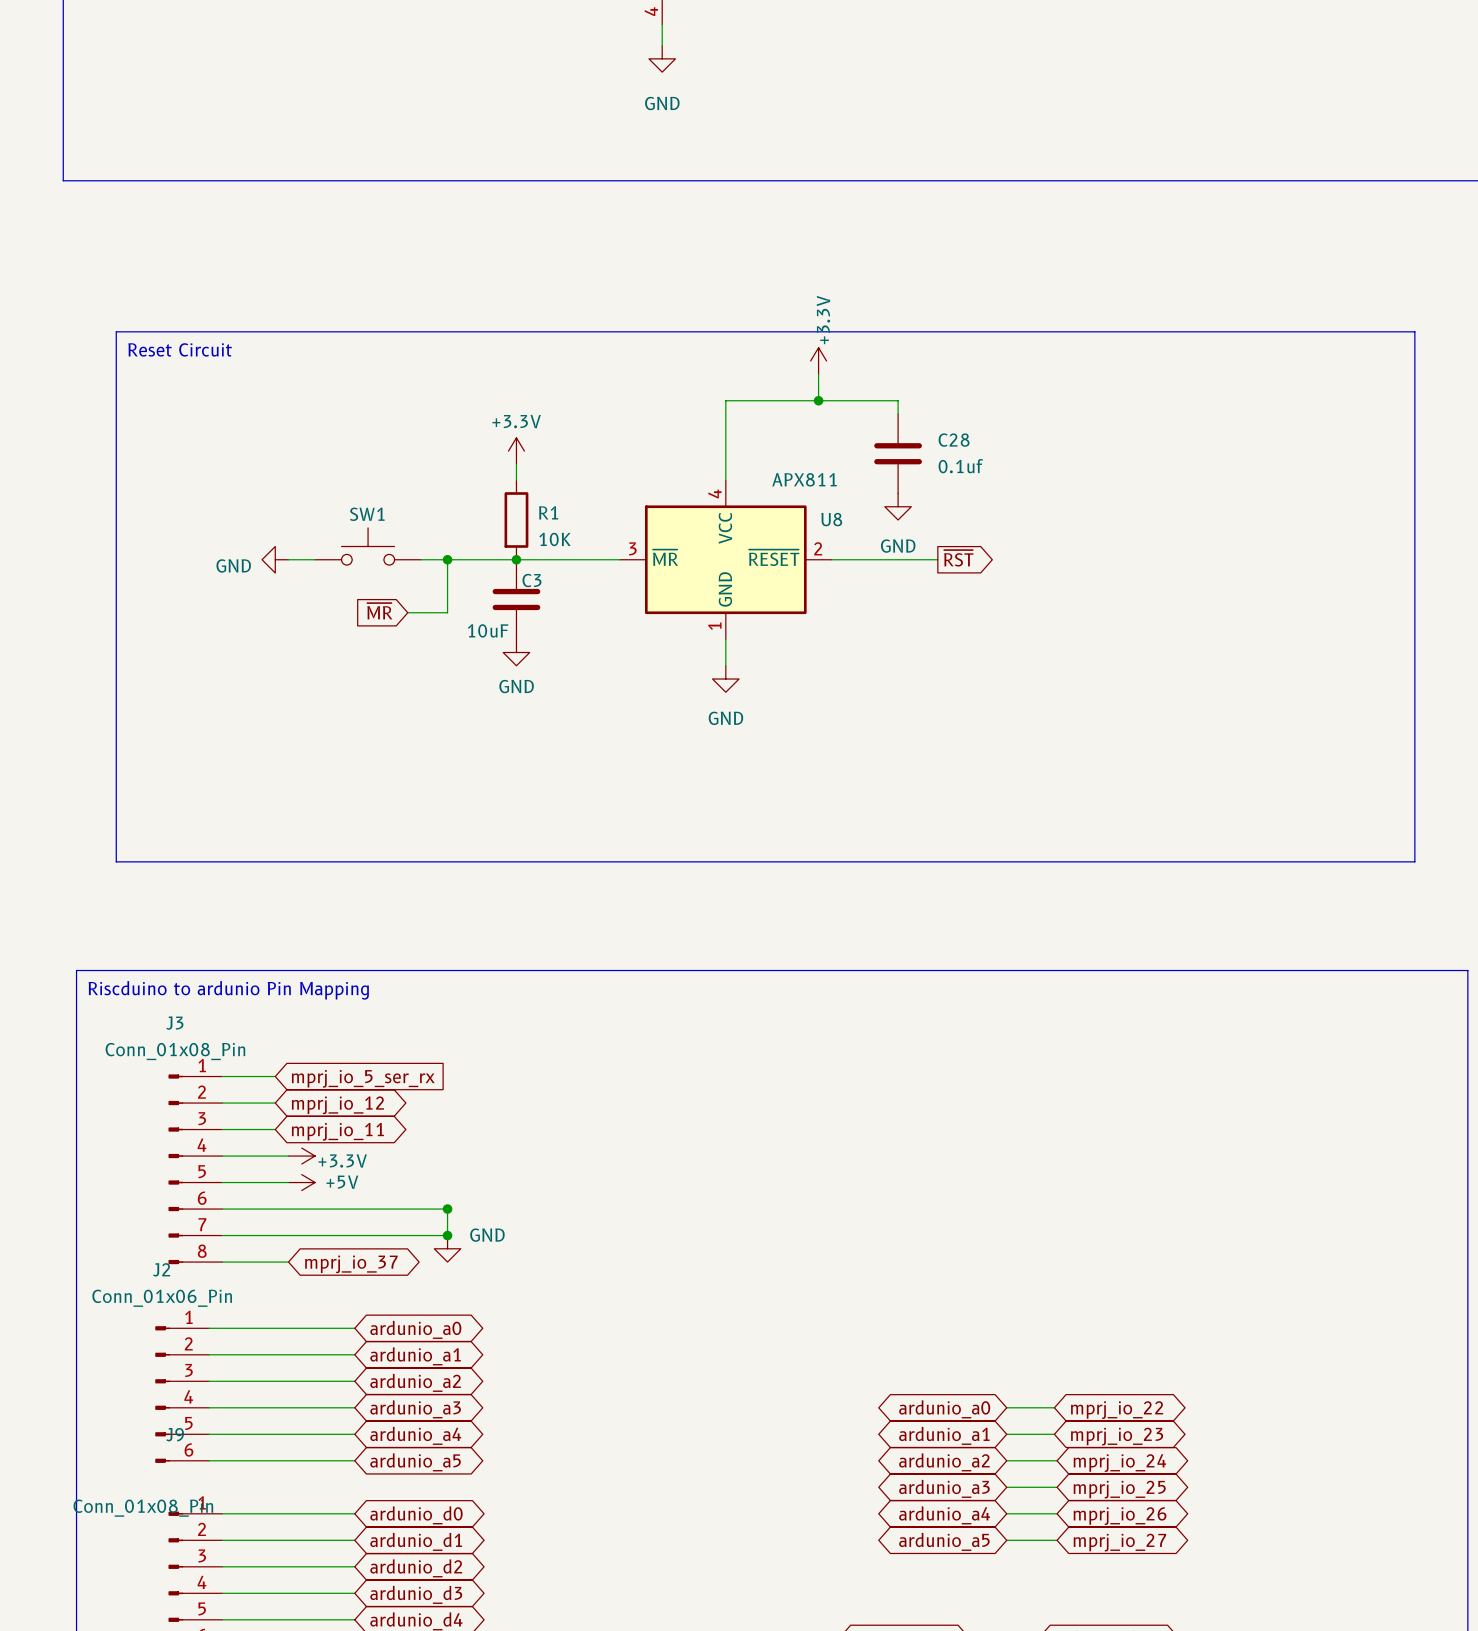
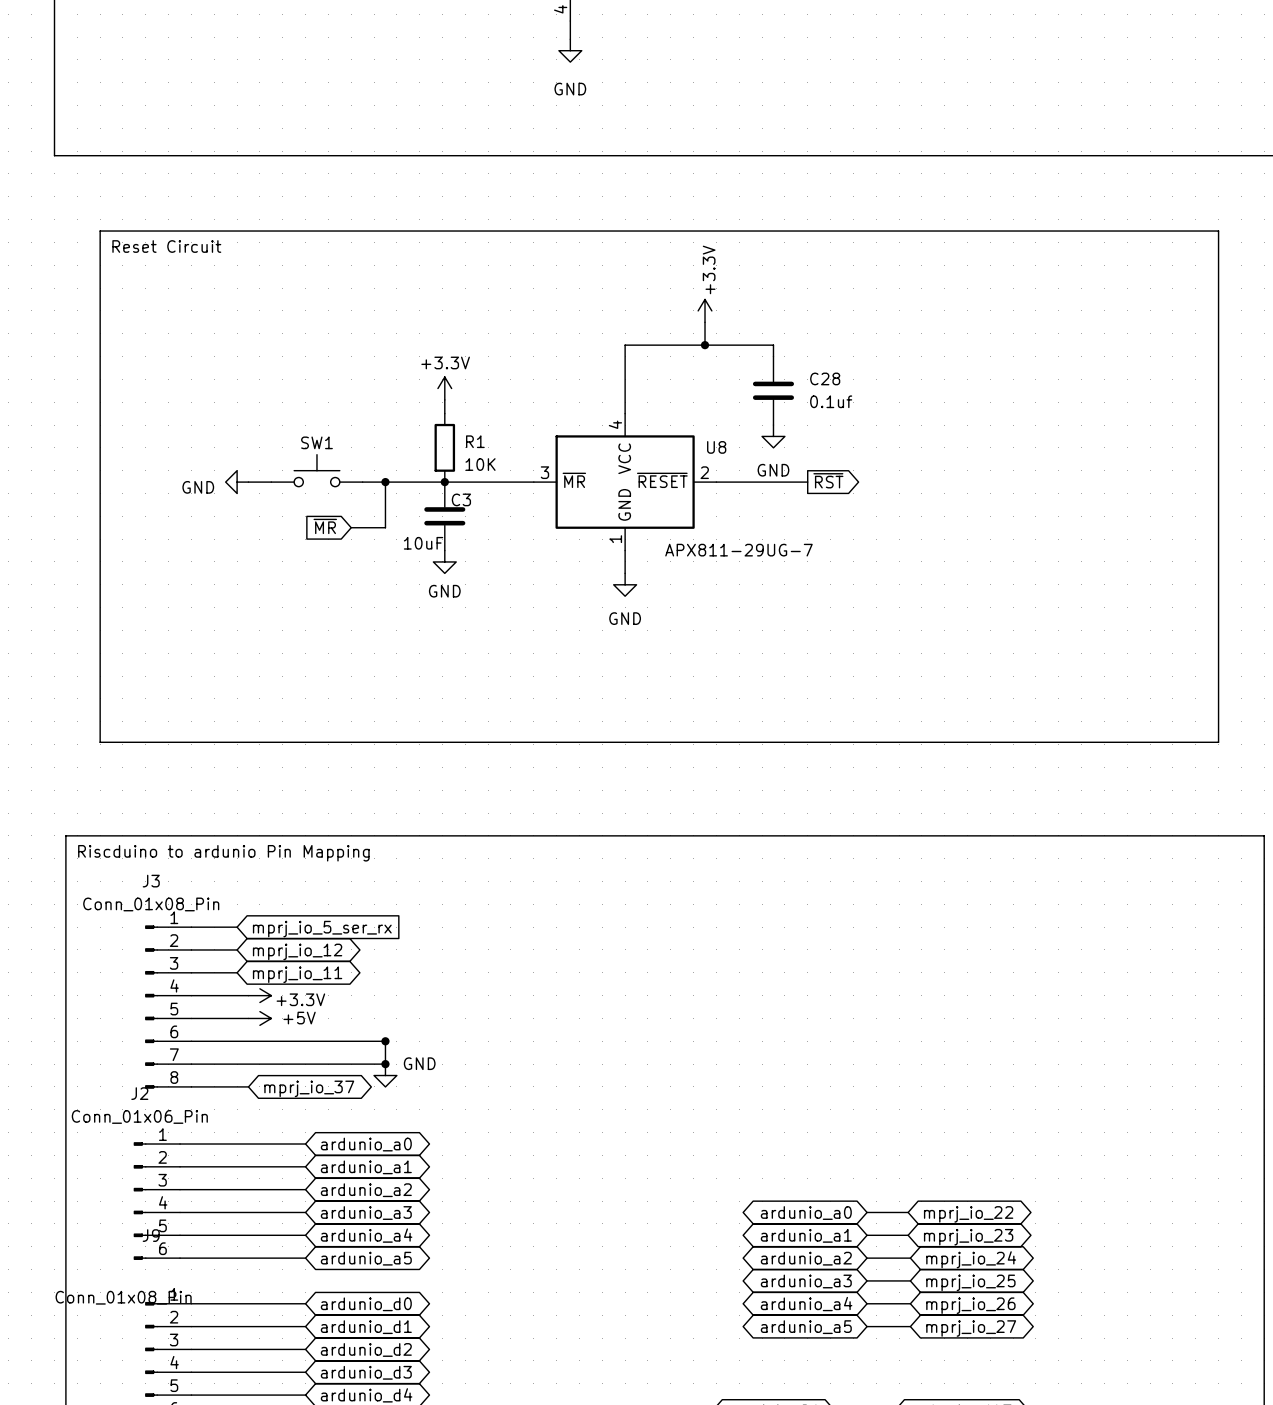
line: (116, 331) (1414, 331) -> (100, 285) (100, 231) (1218, 231) (1218, 285)
text position: Reset Circuit (180, 349) -> Reset Circuit (166, 246)
U8 value: APX811 (804, 479) -> APX811-29UG-7 (738, 550)

